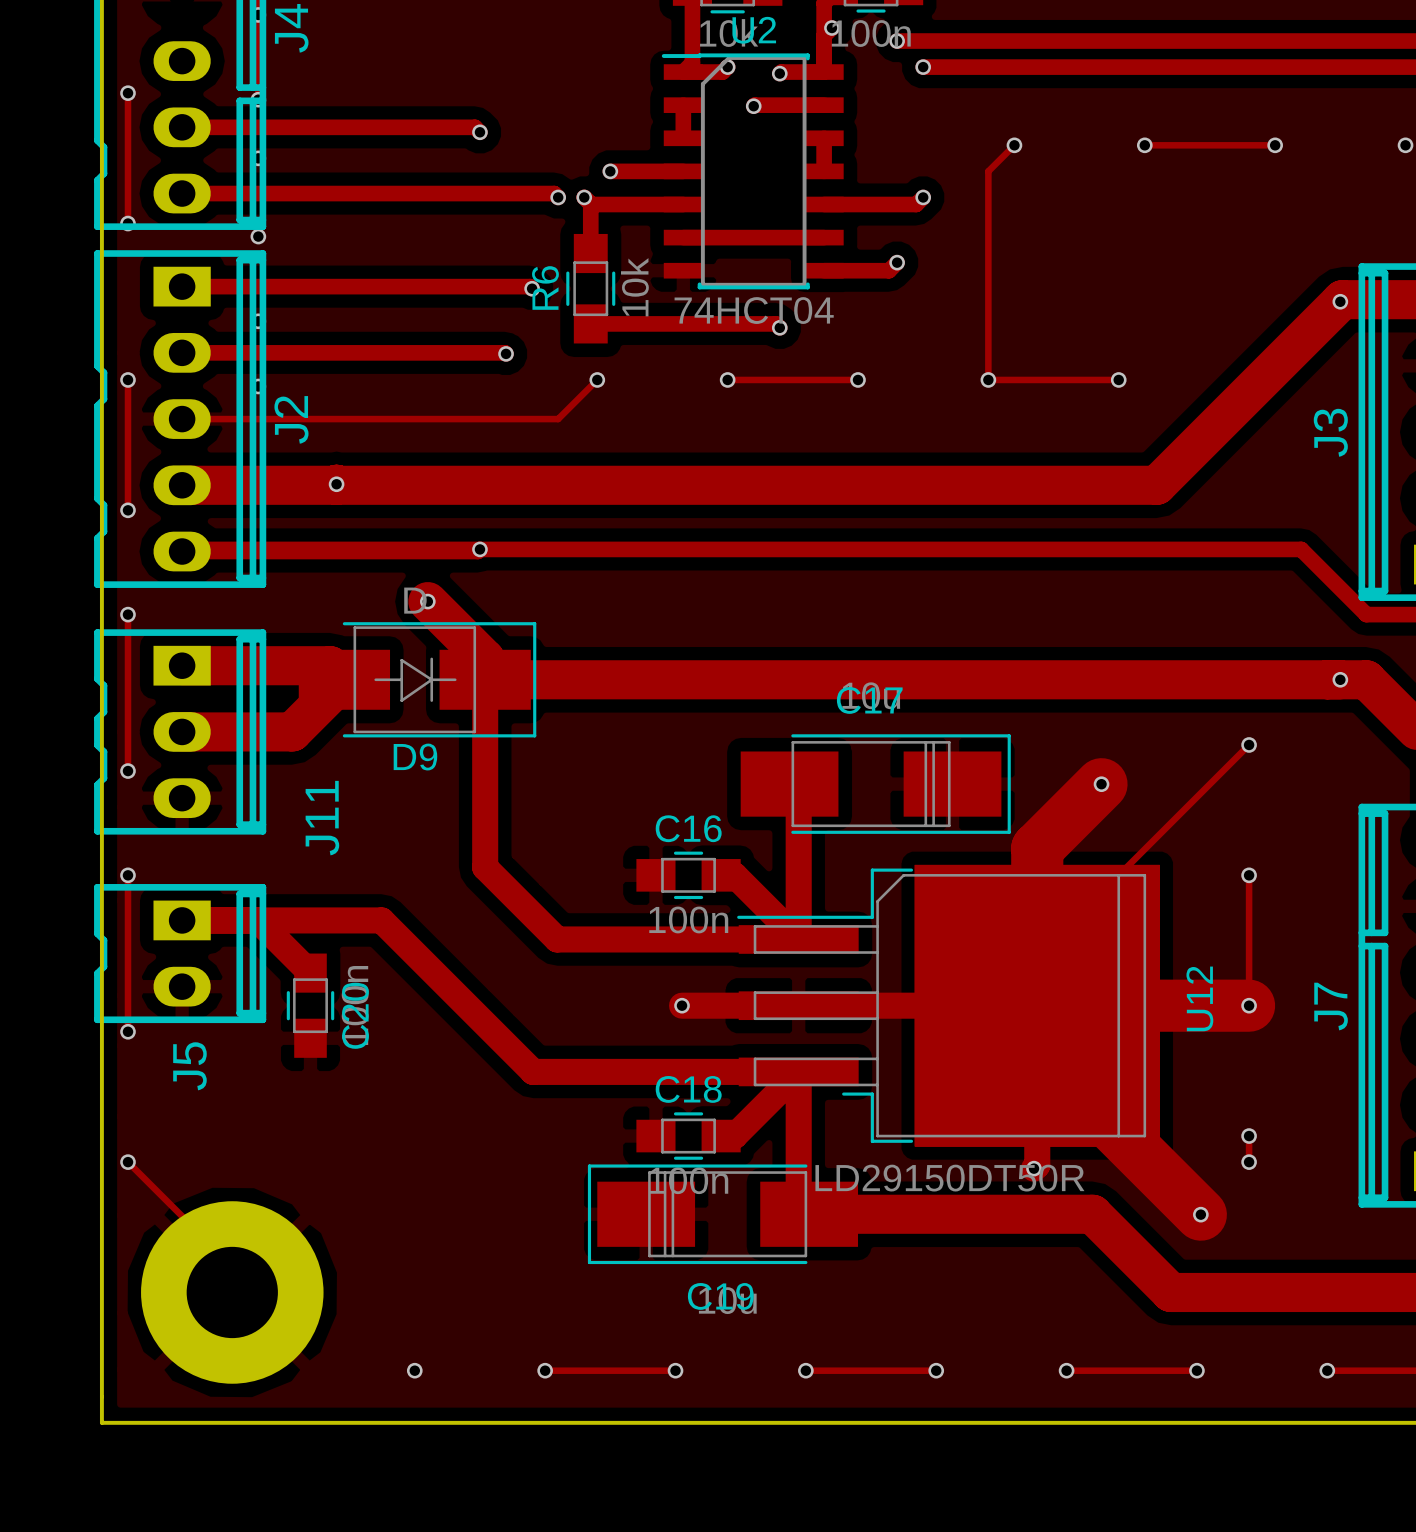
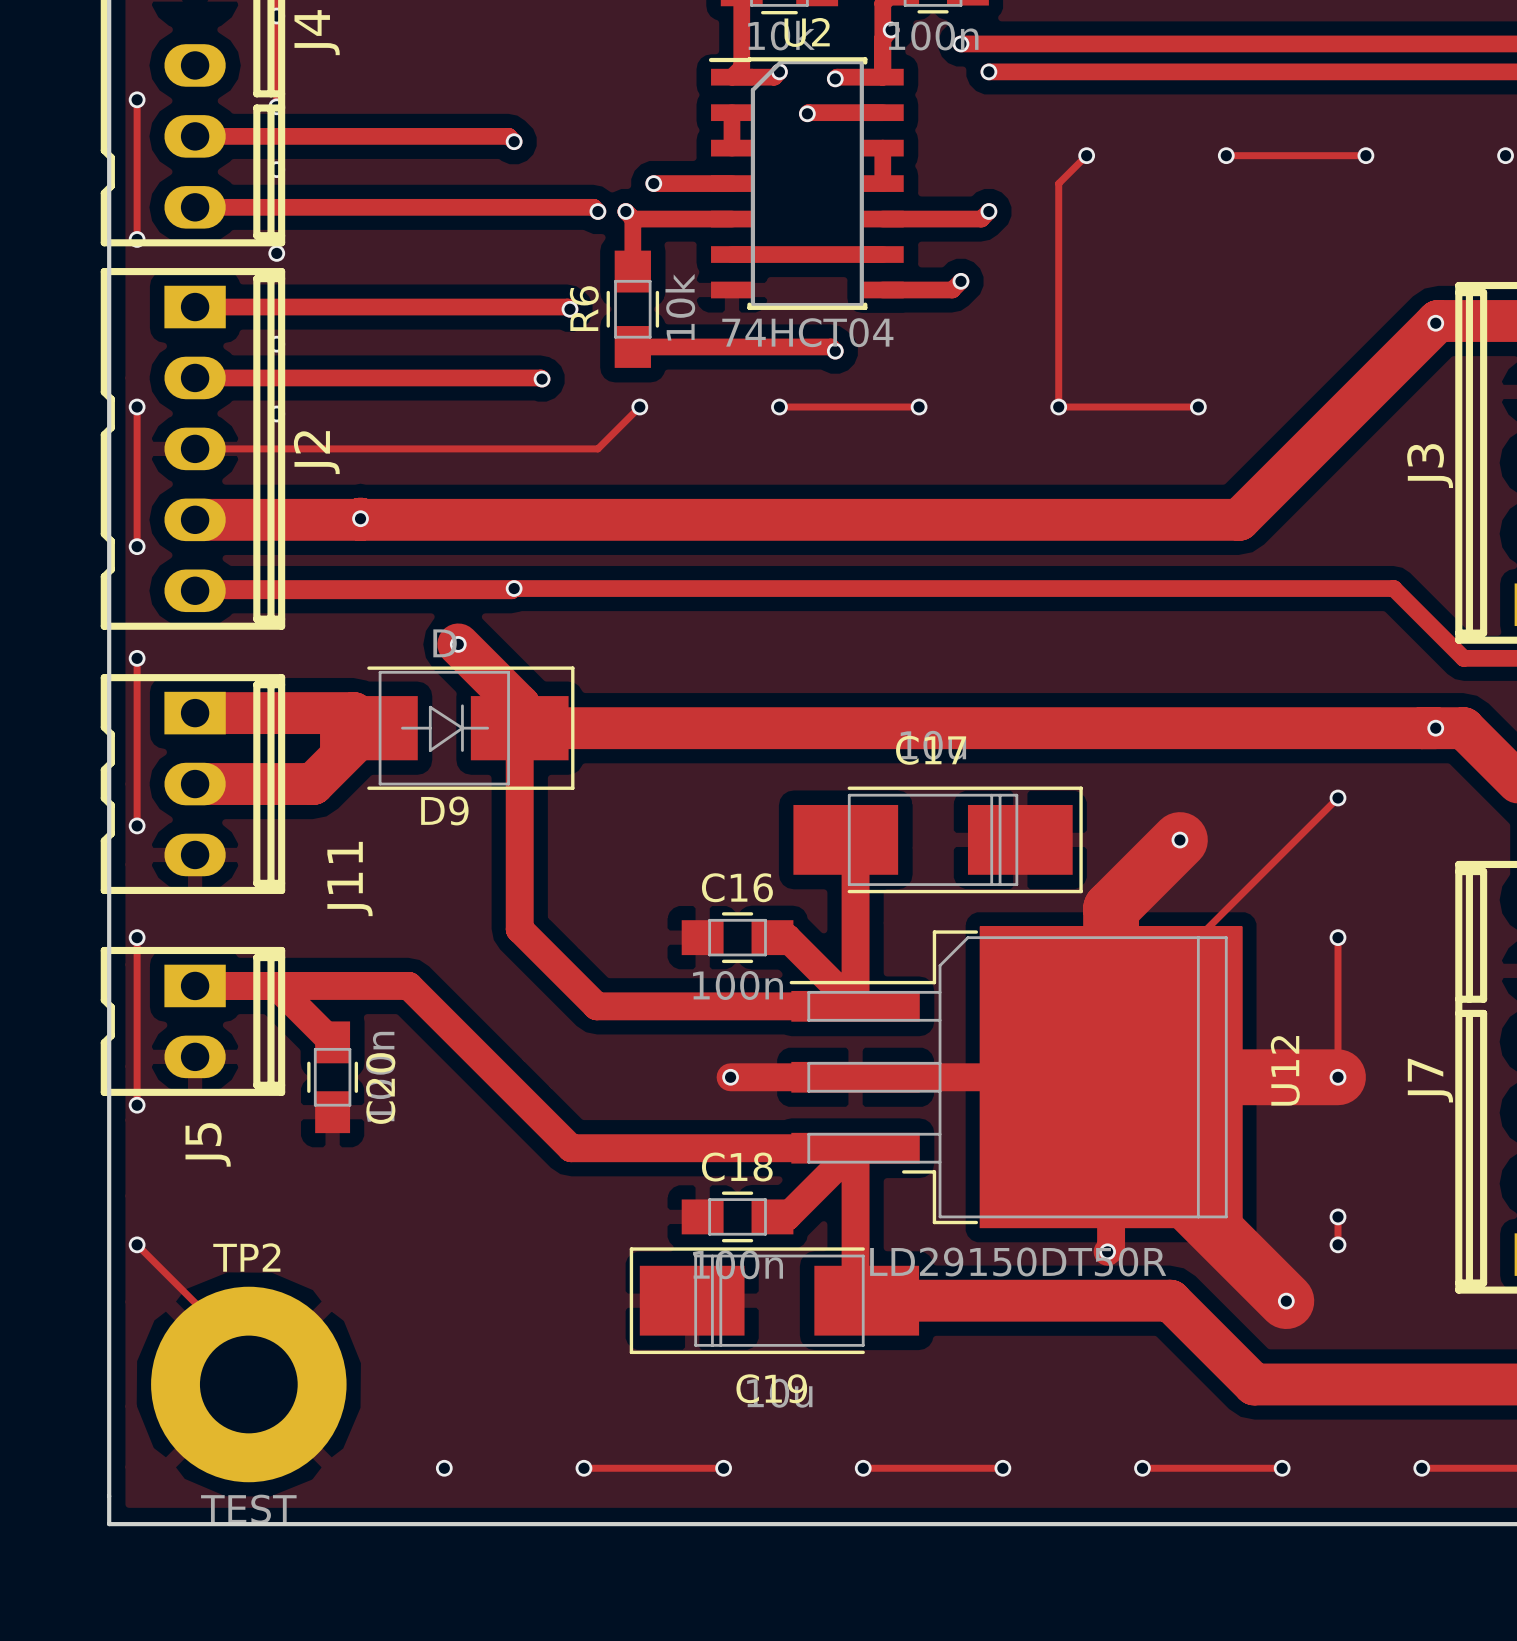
TP2 name: none -> TP2 (246, 1257)
TP2 value: none -> TEST (248, 1509)

